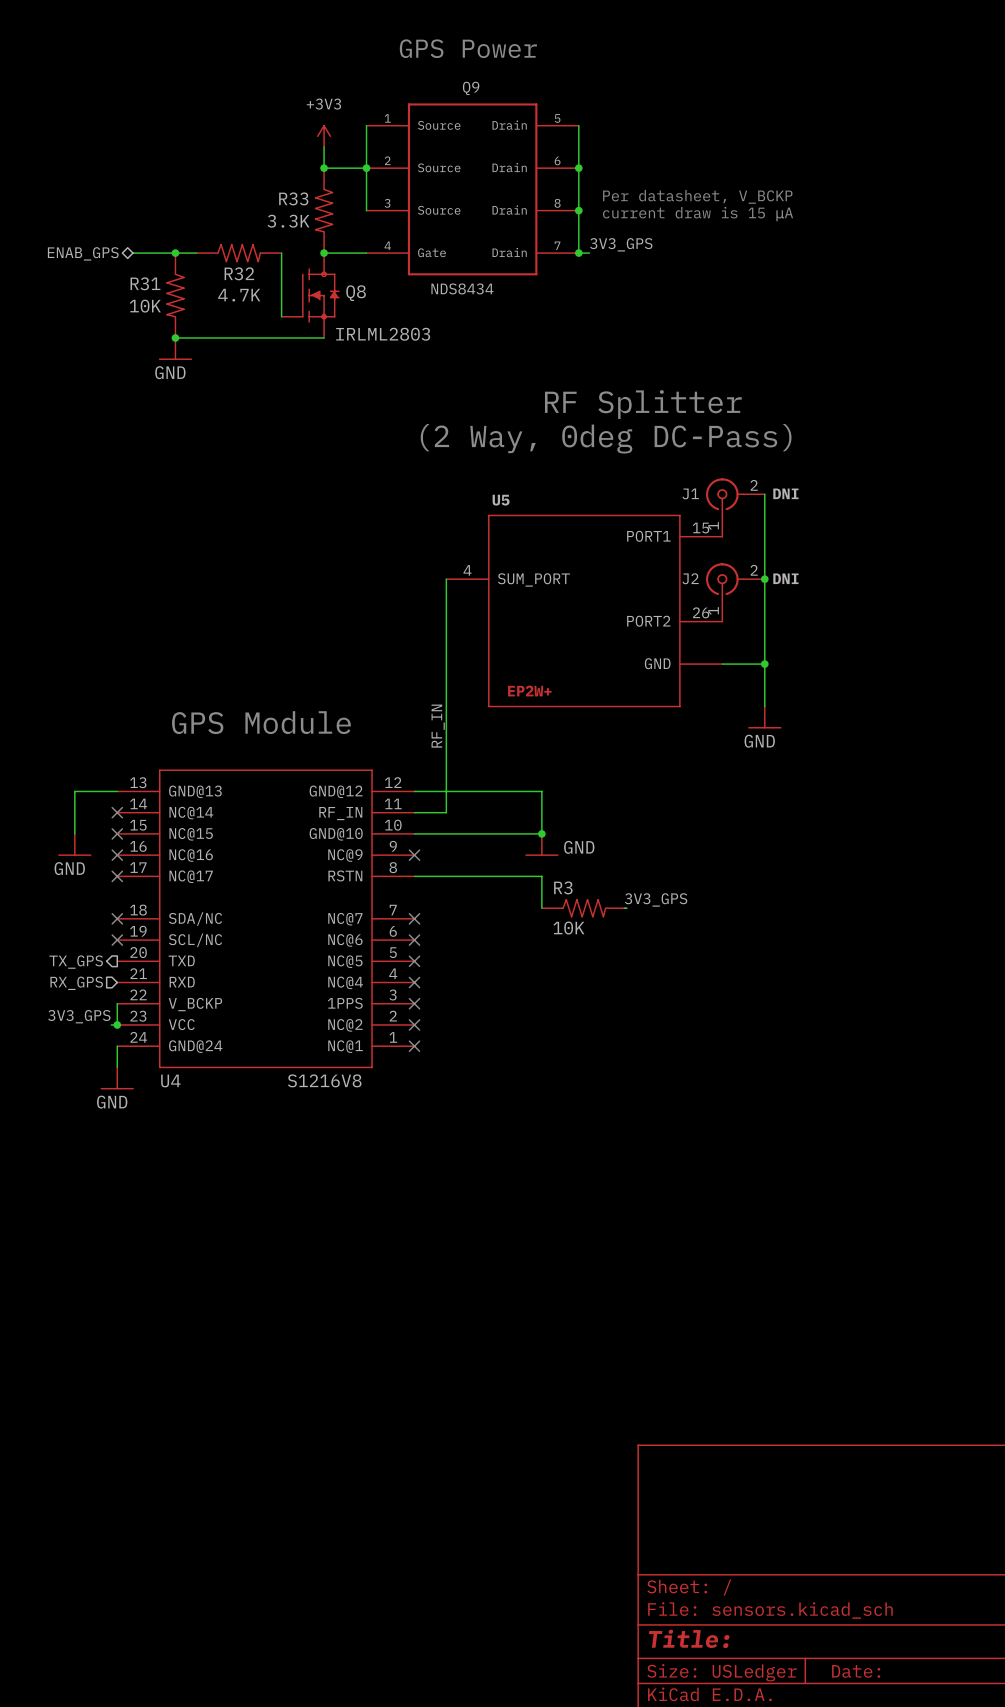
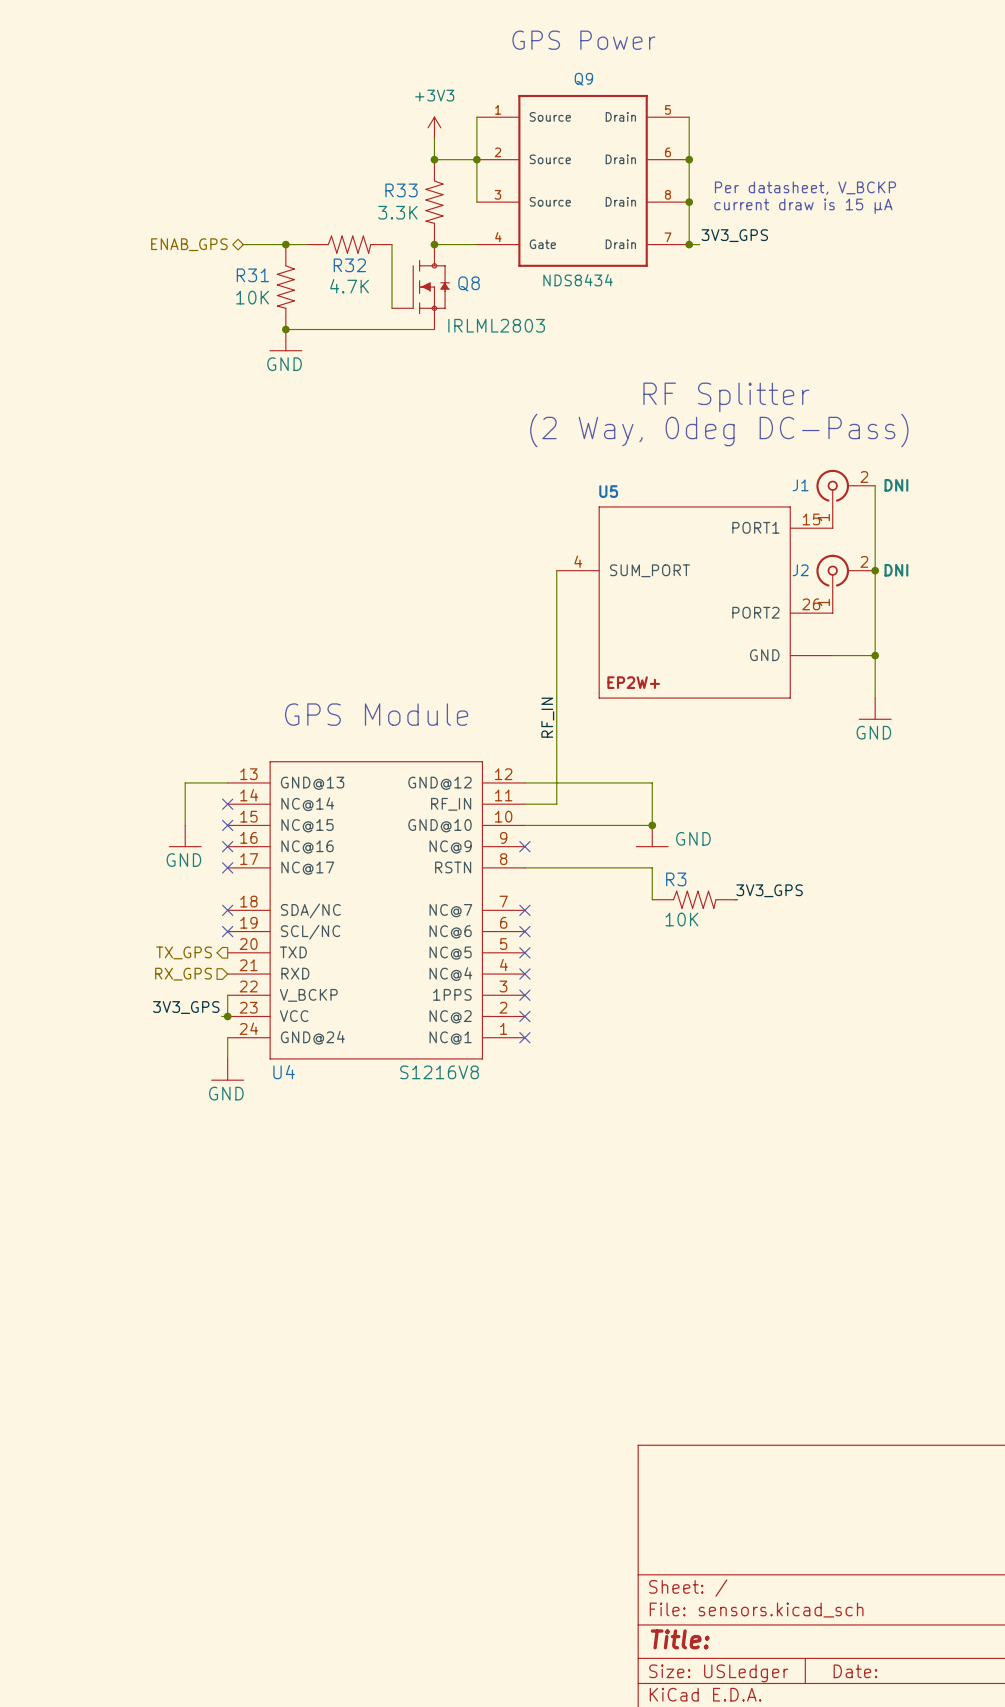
text position: GPS Power (468, 48) -> GPS Power (583, 40)
wire: (366, 125) (366, 210) -> (476, 117) (476, 202)
wire: (578, 125) (578, 253) (589, 253) -> (689, 117) (689, 244) (699, 244)
power symbol position: +3V3 (324, 136) -> +3V3 (434, 127)
wire: (324, 146) (324, 168) (366, 168) -> (434, 138) (434, 159) (476, 159)
junction: none -> (434, 159)
junction: none -> (476, 159)
junction: none -> (689, 159)
junction: (324, 168) -> none
junction: (366, 168) -> none
junction: (578, 168) -> none
Q9 position: (472, 189) -> (583, 180)
text position: Per datasheet, V_BCKP (697, 196) -> Per datasheet, V_BCKP (805, 188)
junction: none -> (689, 202)
R33 position: (324, 210) -> (434, 202)
junction: (578, 210) -> none
text position: current draw is 15 μA (698, 214) -> current draw is 15 μA (803, 206)
junction: none -> (434, 244)
label position: 3V3_GPS (621, 244) -> 3V3_GPS (734, 235)
junction: none -> (689, 244)
hierarchical label position: ENAB_GPS (83, 253) -> ENAB_GPS (189, 244)
wire: (132, 253) (196, 253) -> (243, 244) (307, 244)
junction: (175, 253) -> none
R32 position: (239, 253) -> (349, 244)
wire: (281, 253) (281, 316) -> (391, 244) (391, 308)
wire: (324, 253) (366, 253) -> (434, 244) (476, 244)
junction position: (324, 253) -> (285, 244)
junction: (578, 253) -> none
R31 position: (175, 295) -> (285, 287)
Q8 position: (310, 295) -> (420, 287)
junction: none -> (285, 329)
wire: (175, 337) (324, 337) -> (285, 329) (434, 329)
junction: (175, 337) -> none
power symbol position: GND (175, 348) -> GND (285, 340)
text position: RF Splitter (643, 404) -> RF Splitter (726, 397)
text position: (2 Way, 0deg DC-Pass) (606, 438) -> (2 Way, 0deg DC-Pass) (719, 430)
wire: (764, 494) (764, 706) -> (875, 485) (875, 698)
J1 position: (735, 507) -> (845, 499)
junction: none -> (875, 570)
wire: (446, 579) (446, 812) (414, 812) -> (556, 570) (556, 804) (524, 804)
junction: (764, 579) -> none
J2 position: (735, 592) -> (845, 583)
U5 position: (584, 611) -> (694, 602)
junction: none -> (875, 655)
wire: (722, 664) (764, 664) -> (832, 655) (875, 655)
junction: (764, 664) -> none
power symbol: none -> GND (875, 708)
power symbol: GND (764, 717) -> none
text position: GPS Module (261, 722) -> GPS Module (376, 714)
label position: RF_IN (438, 726) -> RF_IN (547, 717)
wire: (117, 791) (74, 791) (74, 833) -> (227, 782) (185, 782) (185, 825)
wire: (414, 791) (541, 791) (541, 833) (414, 833) -> (524, 782) (652, 782) (652, 825) (524, 825)
no-connect mark: none -> (227, 804)
no-connect mark: (117, 812) -> none
no-connect mark: none -> (227, 825)
junction: none -> (652, 825)
no-connect mark: (117, 833) -> none
junction: (541, 833) -> none
power symbol: none -> GND (652, 836)
power symbol position: GND (74, 844) -> GND (185, 836)
power symbol: GND (541, 844) -> none
no-connect mark: none -> (227, 846)
no-connect mark: none -> (524, 846)
no-connect mark: (117, 855) -> none
no-connect mark: (414, 855) -> none
no-connect mark: none -> (227, 867)
no-connect mark: (117, 876) -> none
wire: (414, 876) (541, 876) (541, 908) -> (524, 867) (652, 867) (652, 899)
label position: 3V3_GPS (656, 899) -> 3V3_GPS (769, 890)
R3 position: (584, 908) -> (694, 899)
wire: (624, 908) (626, 908) -> (734, 899) (737, 899)
no-connect mark: none -> (227, 910)
no-connect mark: none -> (524, 910)
no-connect mark: (117, 918) -> none
U4 position: (265, 918) -> (376, 910)
no-connect mark: (414, 918) -> none
no-connect mark: none -> (227, 931)
no-connect mark: none -> (524, 931)
no-connect mark: (117, 940) -> none
no-connect mark: (414, 940) -> none
no-connect mark: none -> (524, 952)
no-connect mark: (414, 961) -> none
hierarchical label position: TX_GPS (76, 962) -> TX_GPS (184, 952)
no-connect mark: none -> (524, 974)
no-connect mark: (414, 982) -> none
hierarchical label position: RX_GPS (76, 983) -> RX_GPS (183, 974)
no-connect mark: none -> (524, 995)
wire: (117, 1003) (117, 1024) (111, 1024) -> (227, 995) (227, 1016) (221, 1016)
no-connect mark: (414, 1003) -> none
label position: 3V3_GPS (79, 1016) -> 3V3_GPS (186, 1007)
junction: none -> (227, 1016)
no-connect mark: none -> (524, 1016)
junction: (117, 1024) -> none
no-connect mark: (414, 1024) -> none
no-connect mark: none -> (524, 1037)
wire: (117, 1046) (117, 1067) -> (227, 1037) (227, 1058)
no-connect mark: (414, 1046) -> none
power symbol position: GND (117, 1078) -> GND (227, 1069)

